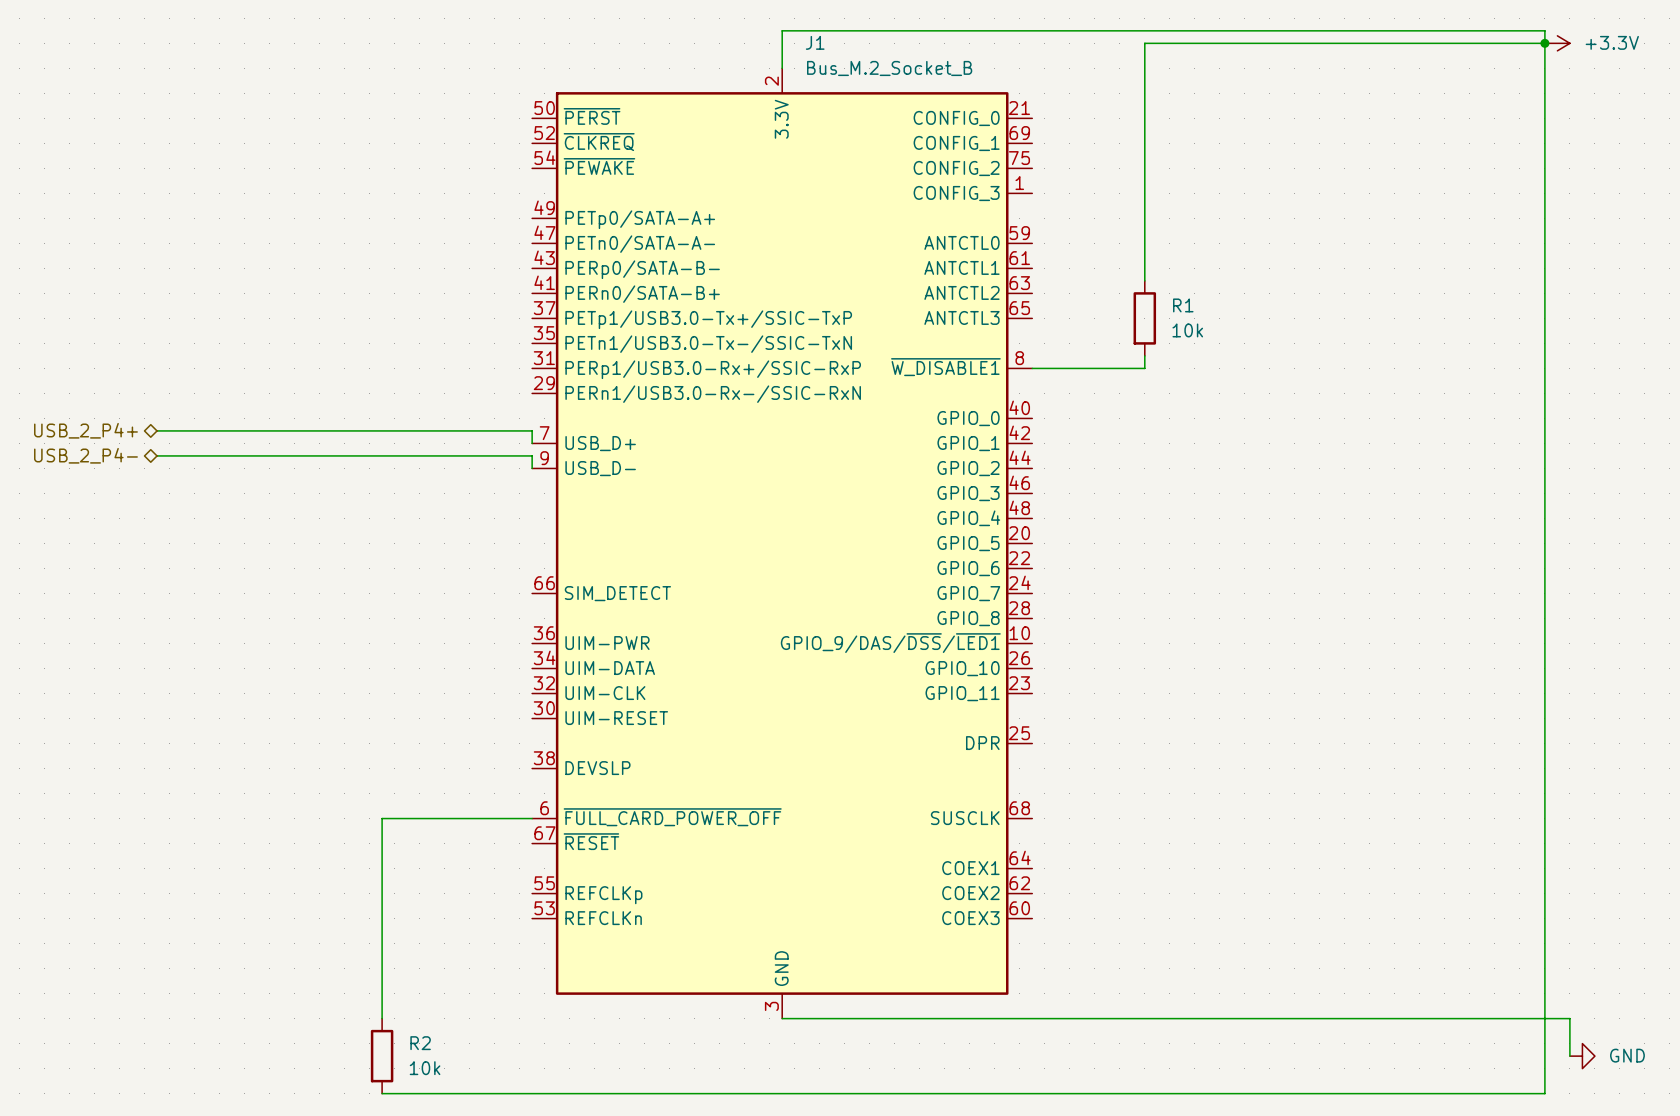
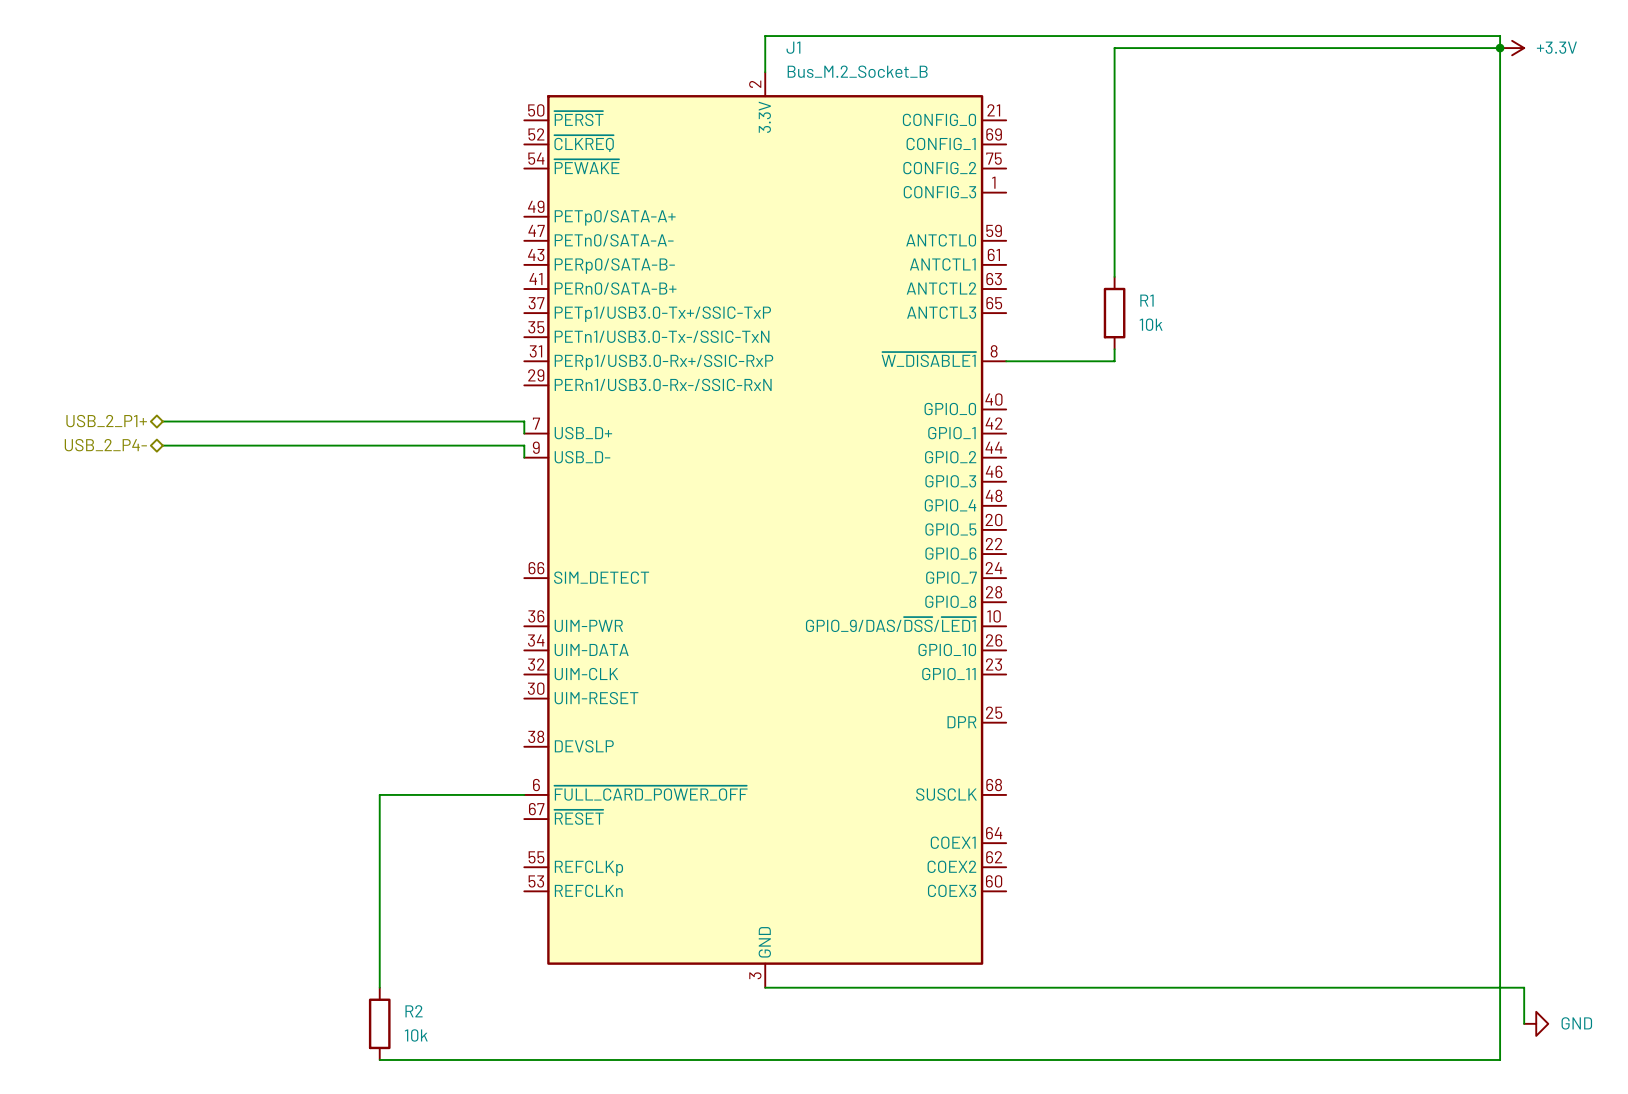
hierarchical label: USB_2_P4+ (85, 430) -> USB_2_P1+ (106, 421)

